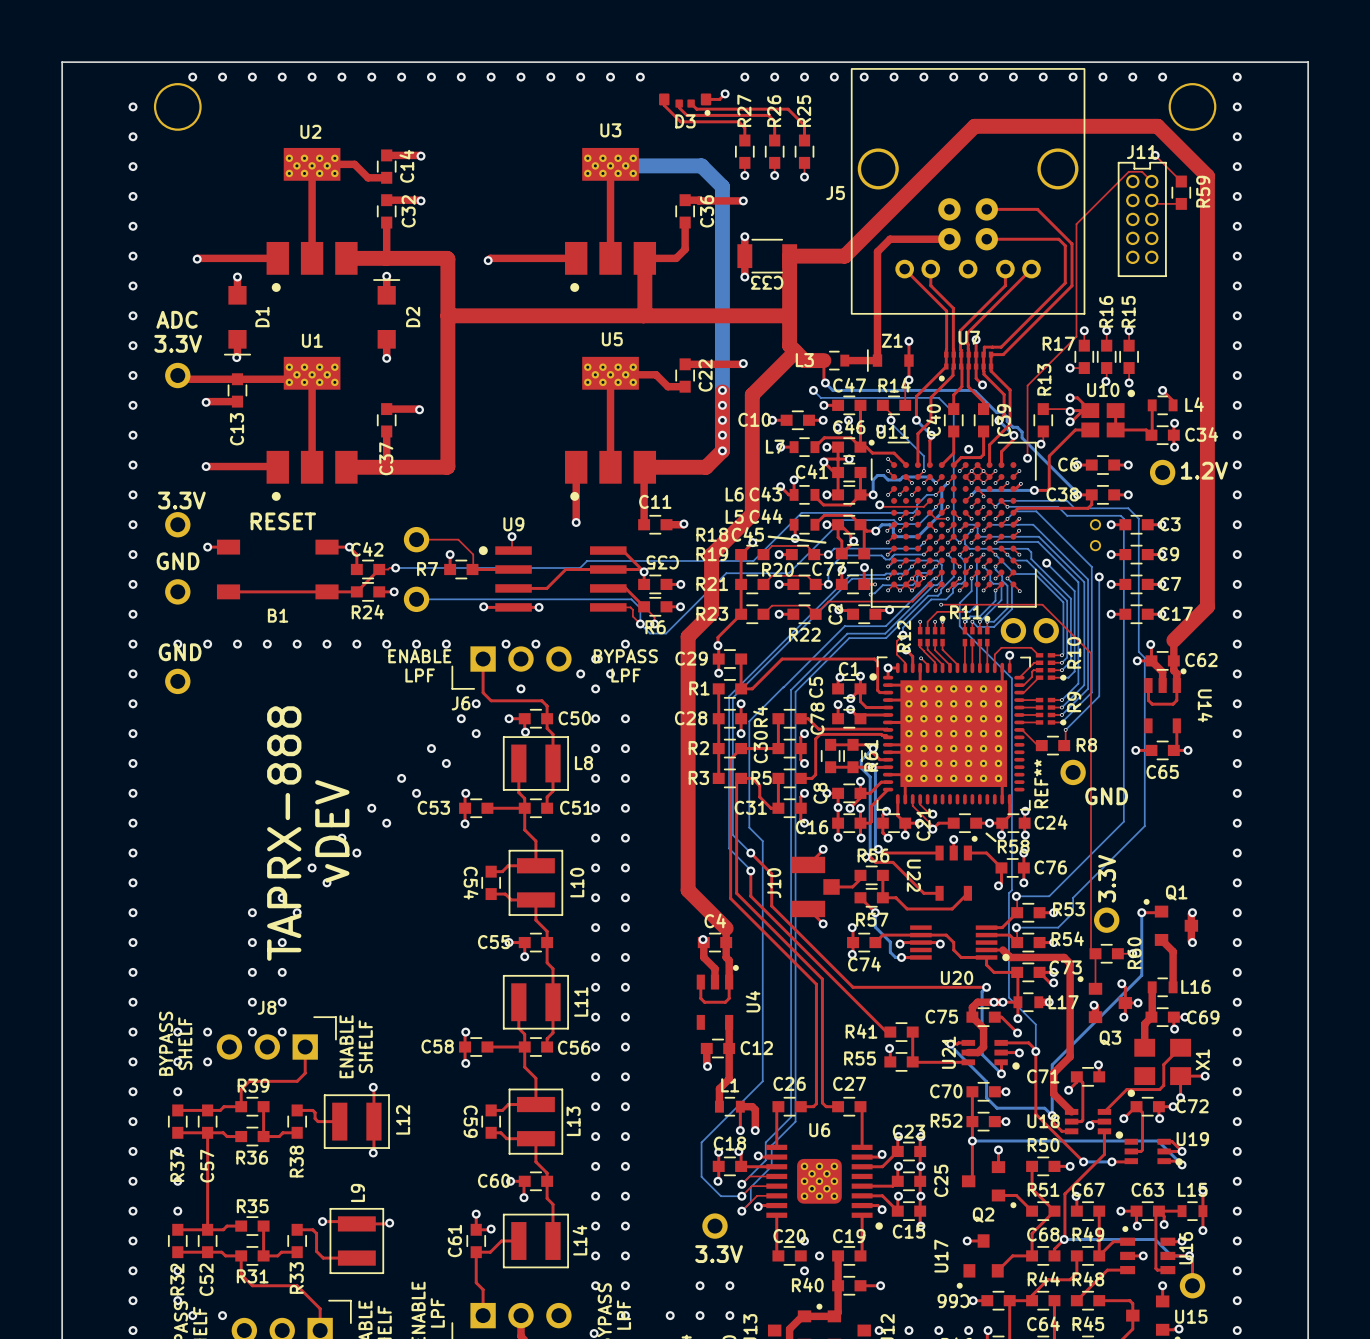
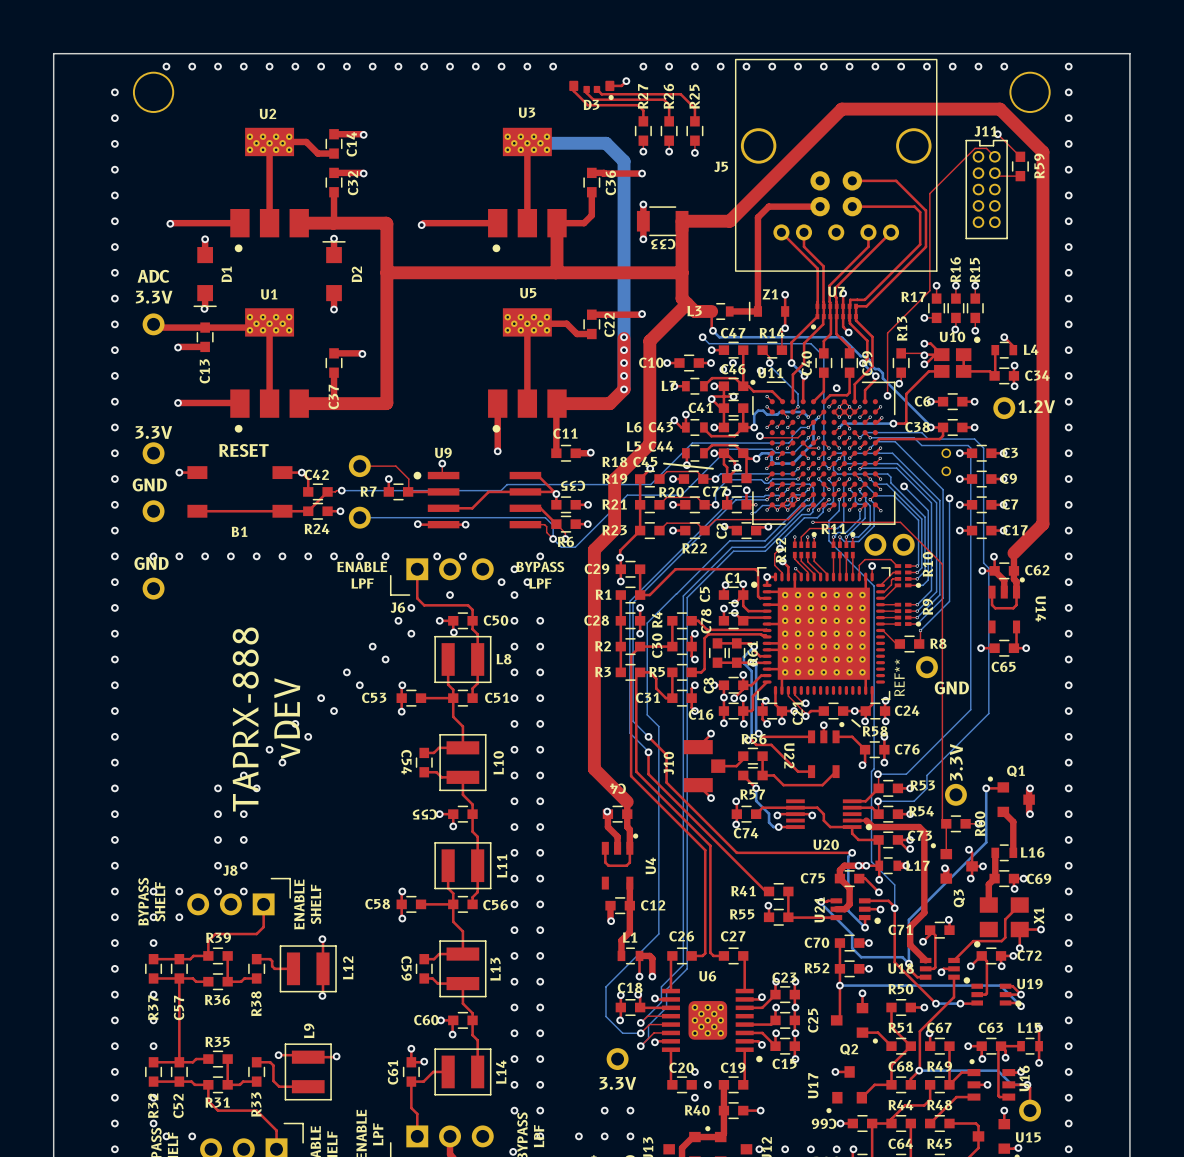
C4 name rotation: 0° (715, 920) -> 180° (617, 788)
C55 name rotation: 0° (494, 942) -> 180° (424, 814)
Q3 name rotation: 0° (1110, 1038) -> 90° counterclockwise (959, 898)

